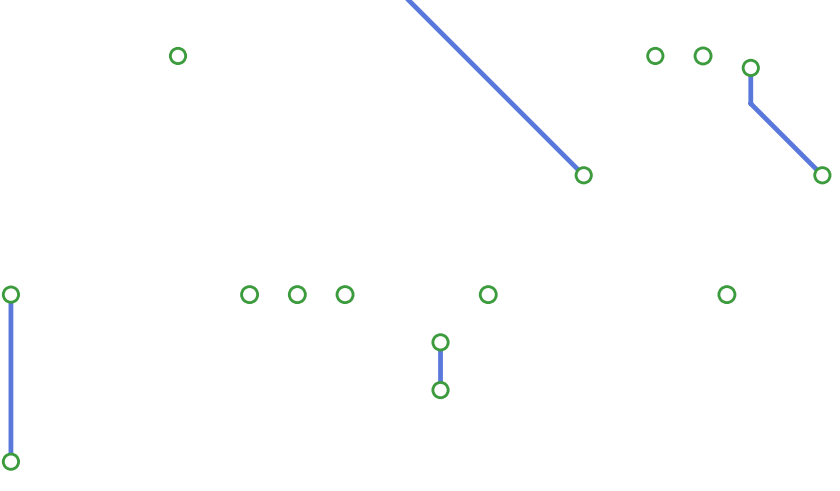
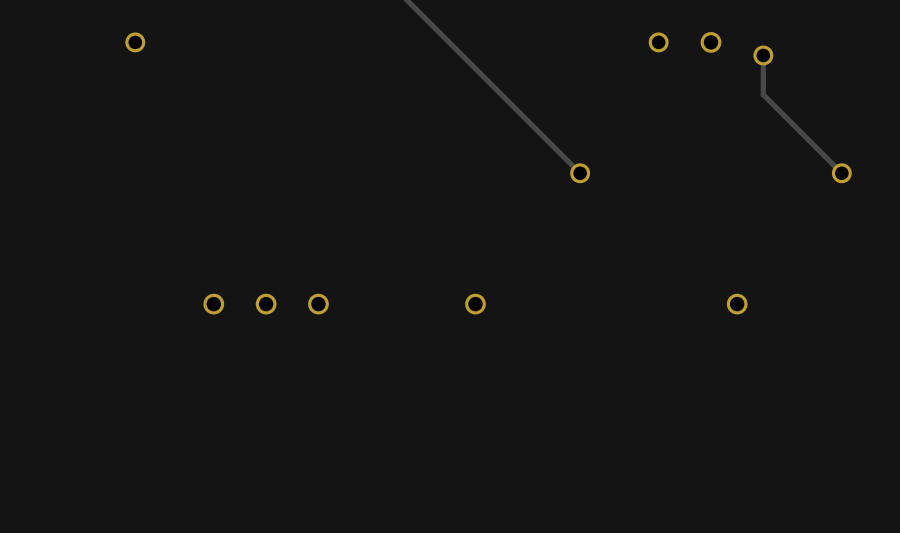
track: (440, 342) (440, 390) -> none
via: (440, 342) -> none
via: (440, 390) -> none

